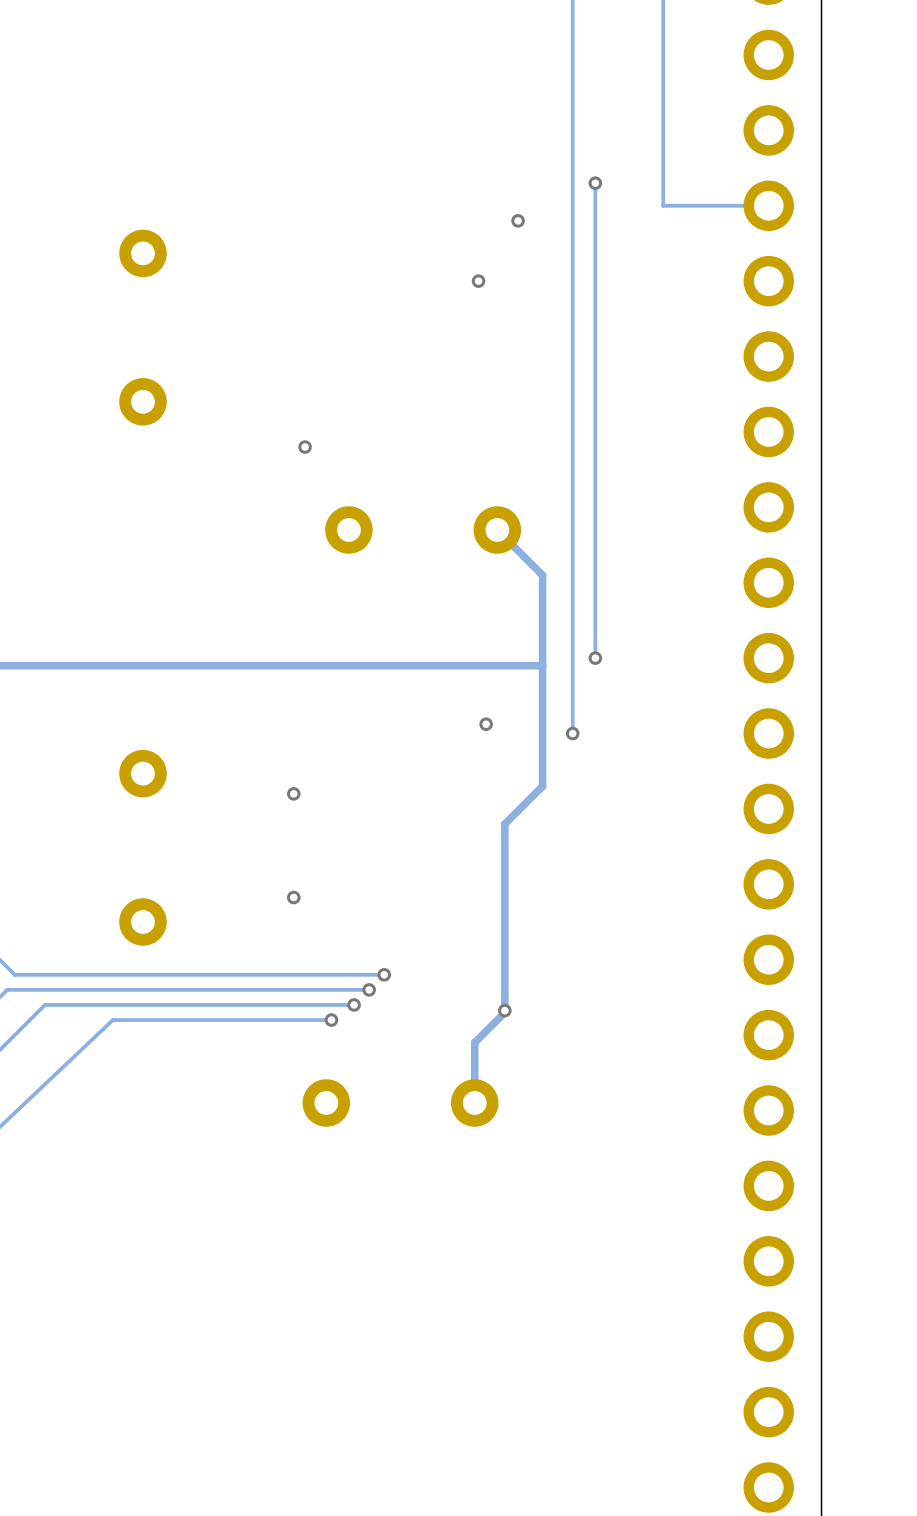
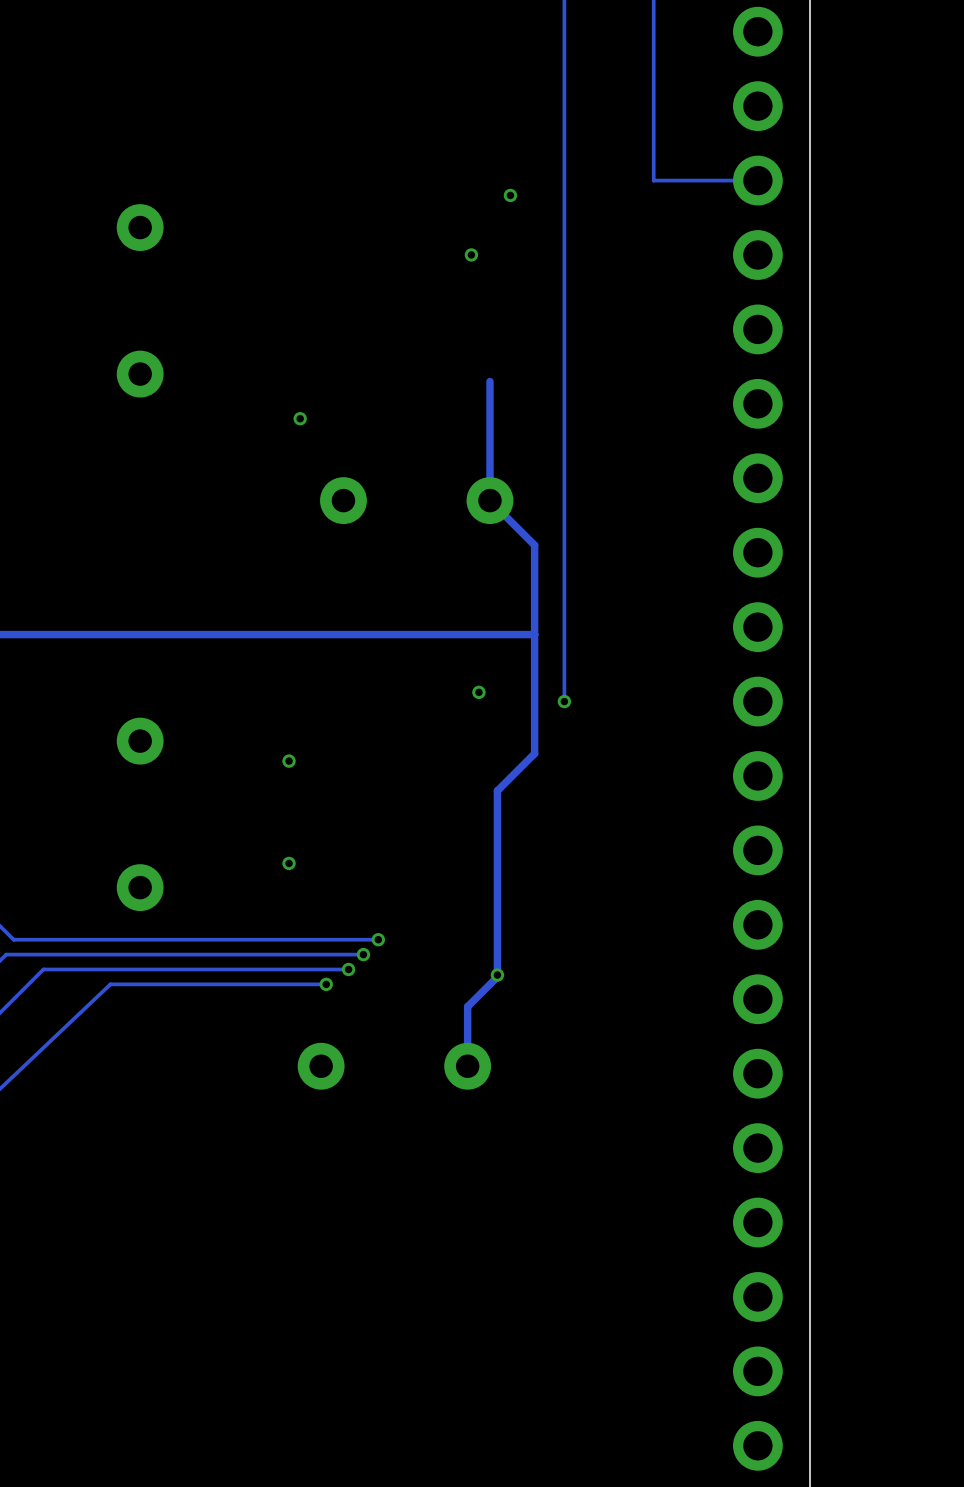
track: (595, 183) (595, 658) -> none
via: (595, 183) -> none
track: none -> (489, 381) (489, 500)
via: (595, 658) -> none

